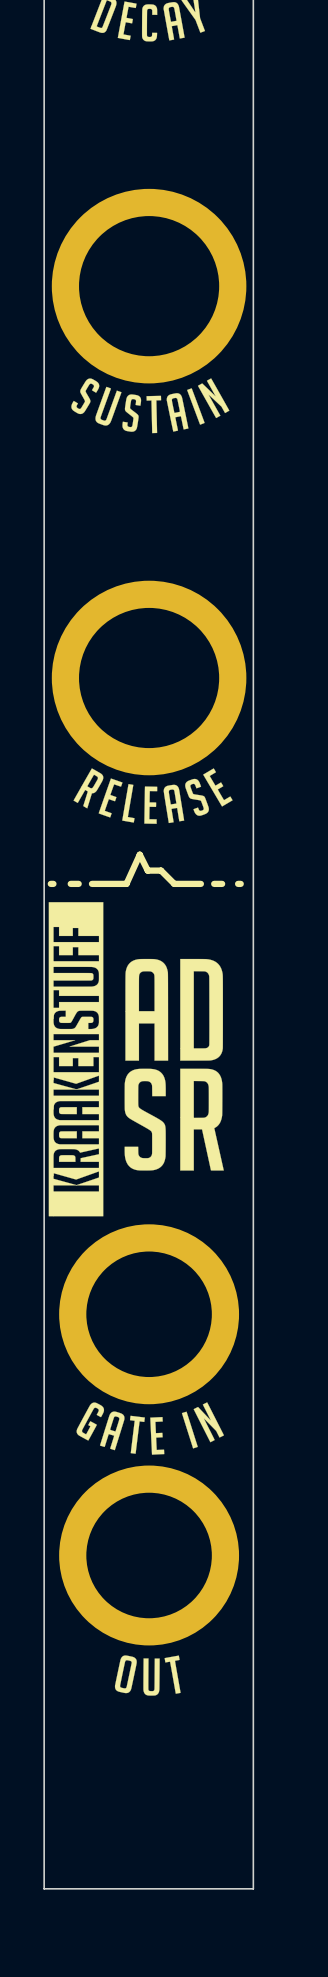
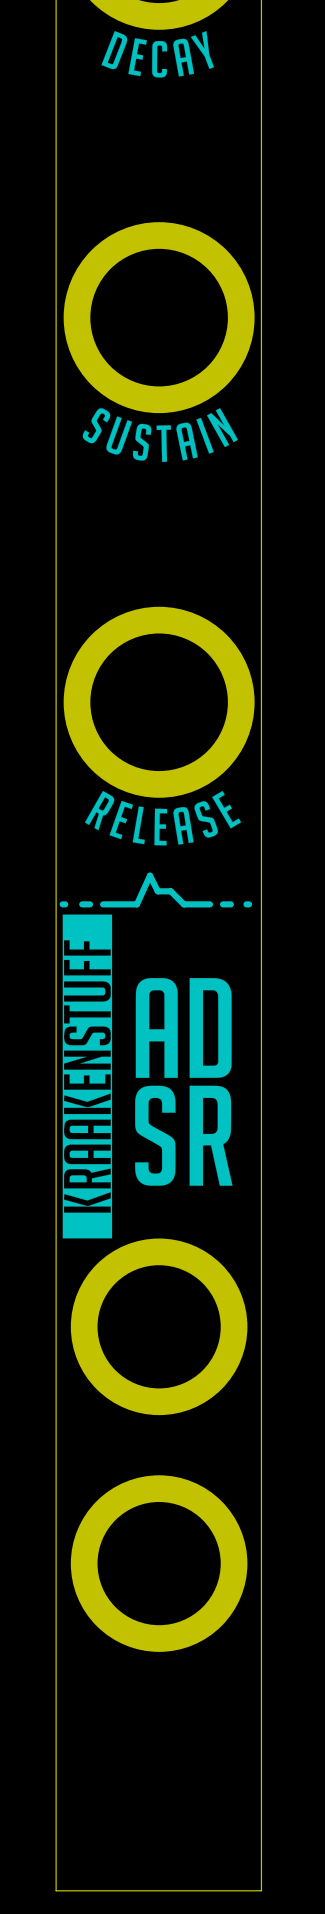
drawing shape: [48, 902, 104, 1217] -> [62, 914, 113, 1239]
drawing: [76, 1402, 225, 1455] -> none
drawing: [114, 1655, 181, 1696] -> none

